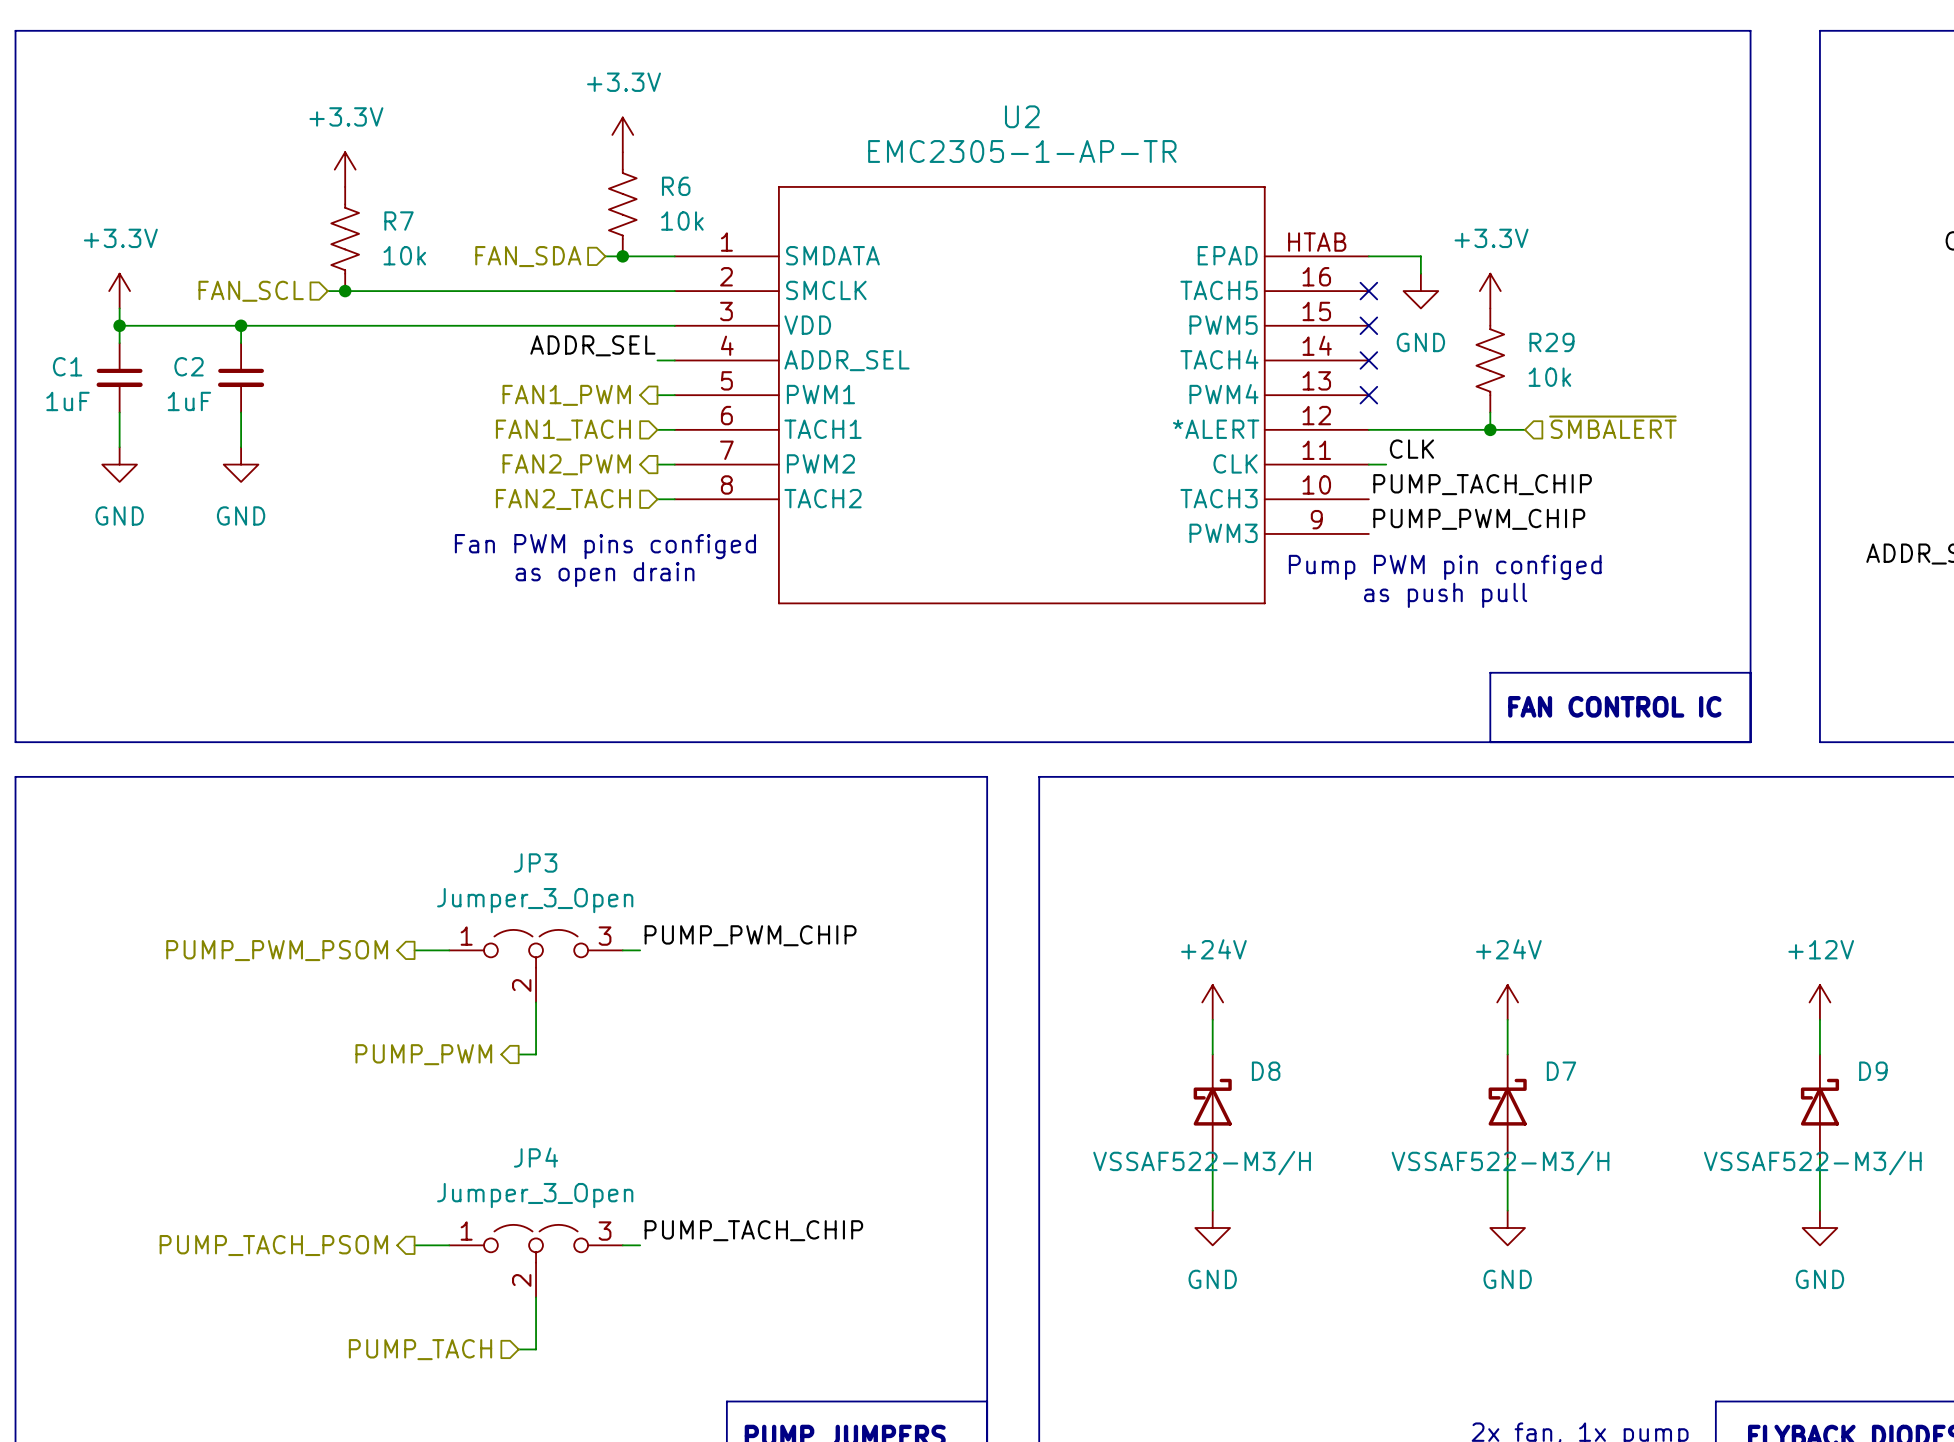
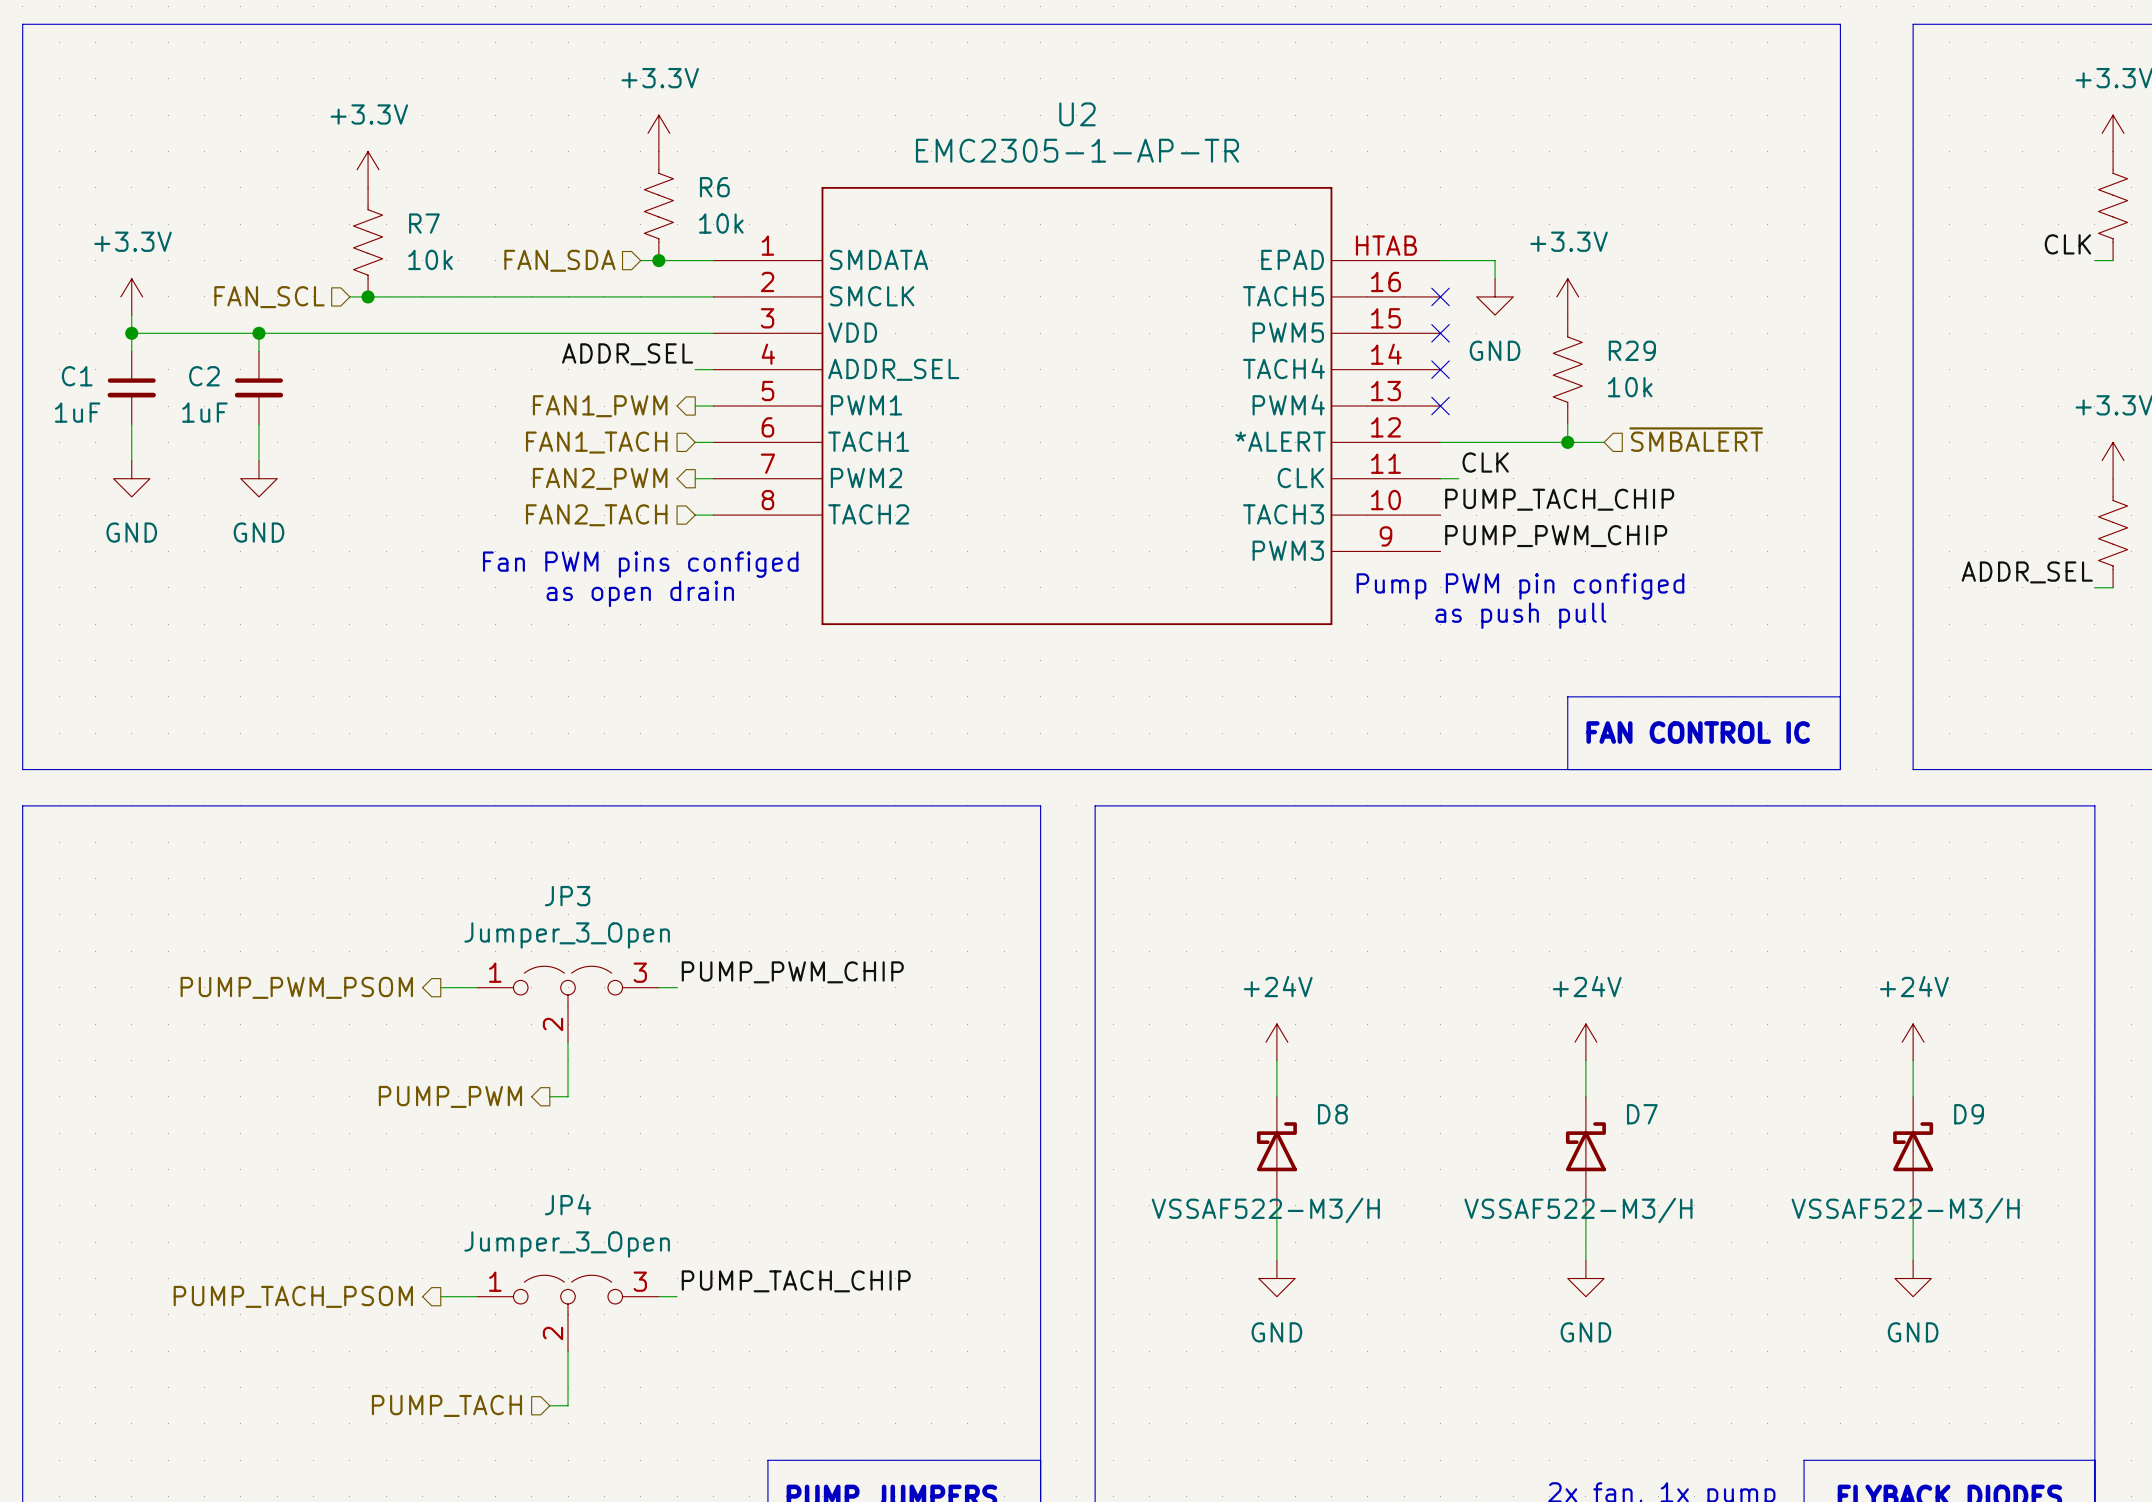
power symbol: +12V (1819, 1002) -> +24V (1913, 1042)

